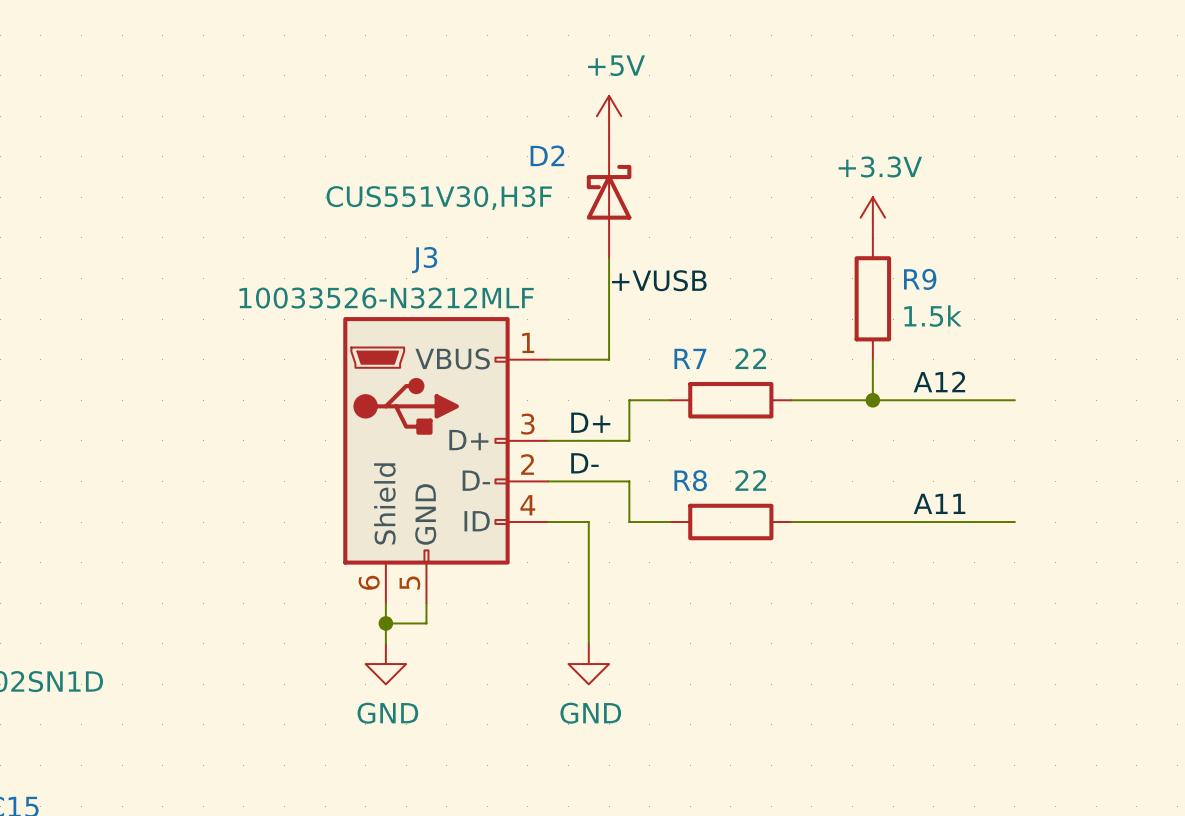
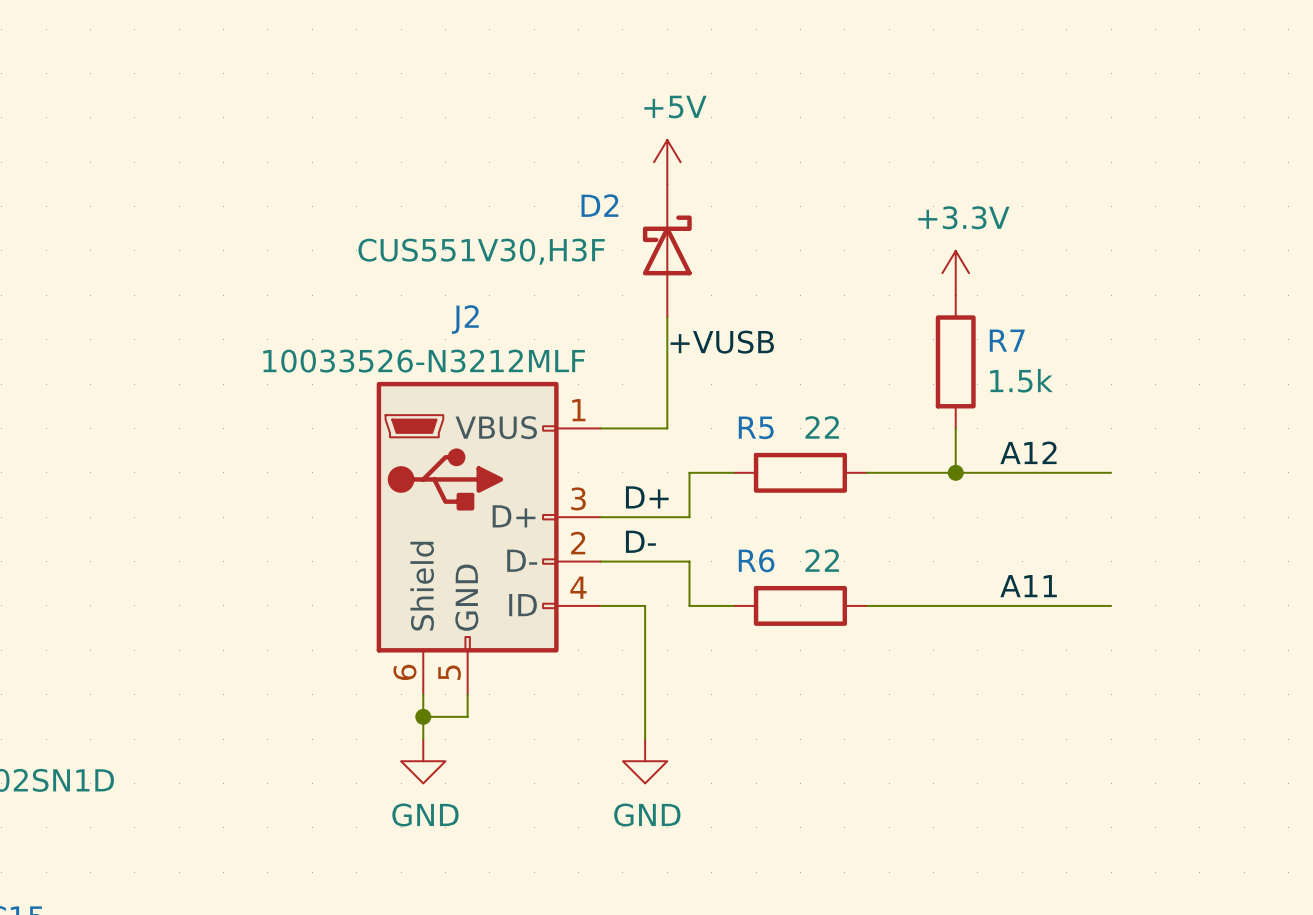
J3 name: J3 (424, 260) -> J2 (465, 319)
R9 name: R9 (920, 279) -> R7 (1007, 340)
R7 name: R7 (690, 358) -> R5 (756, 427)
R8 name: R8 (690, 480) -> R6 (756, 560)

